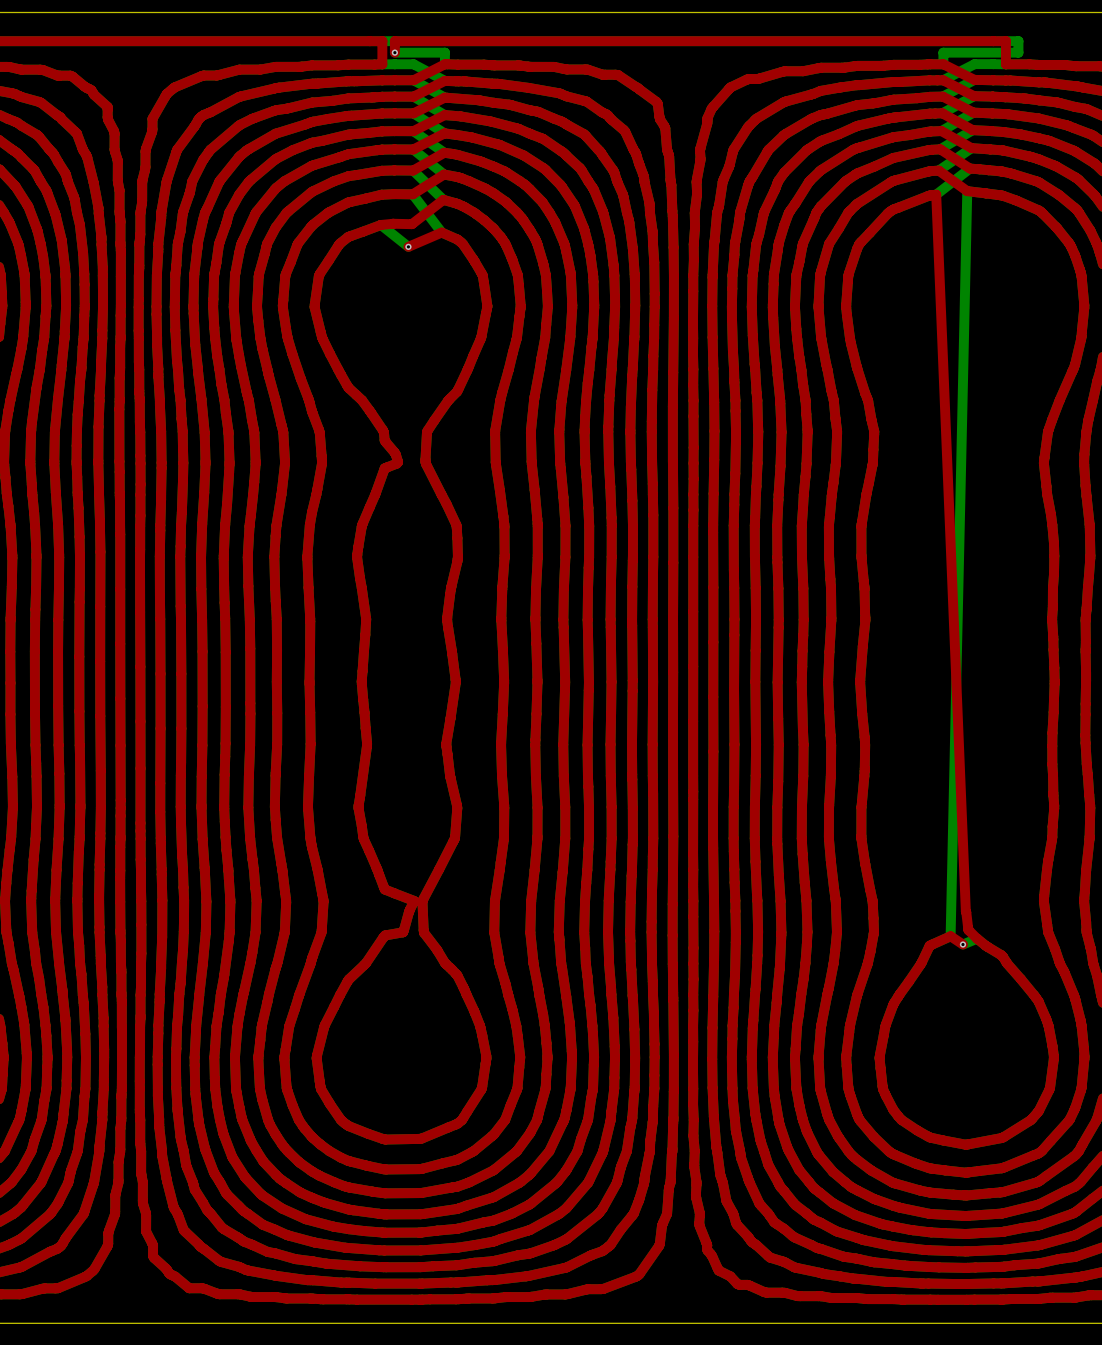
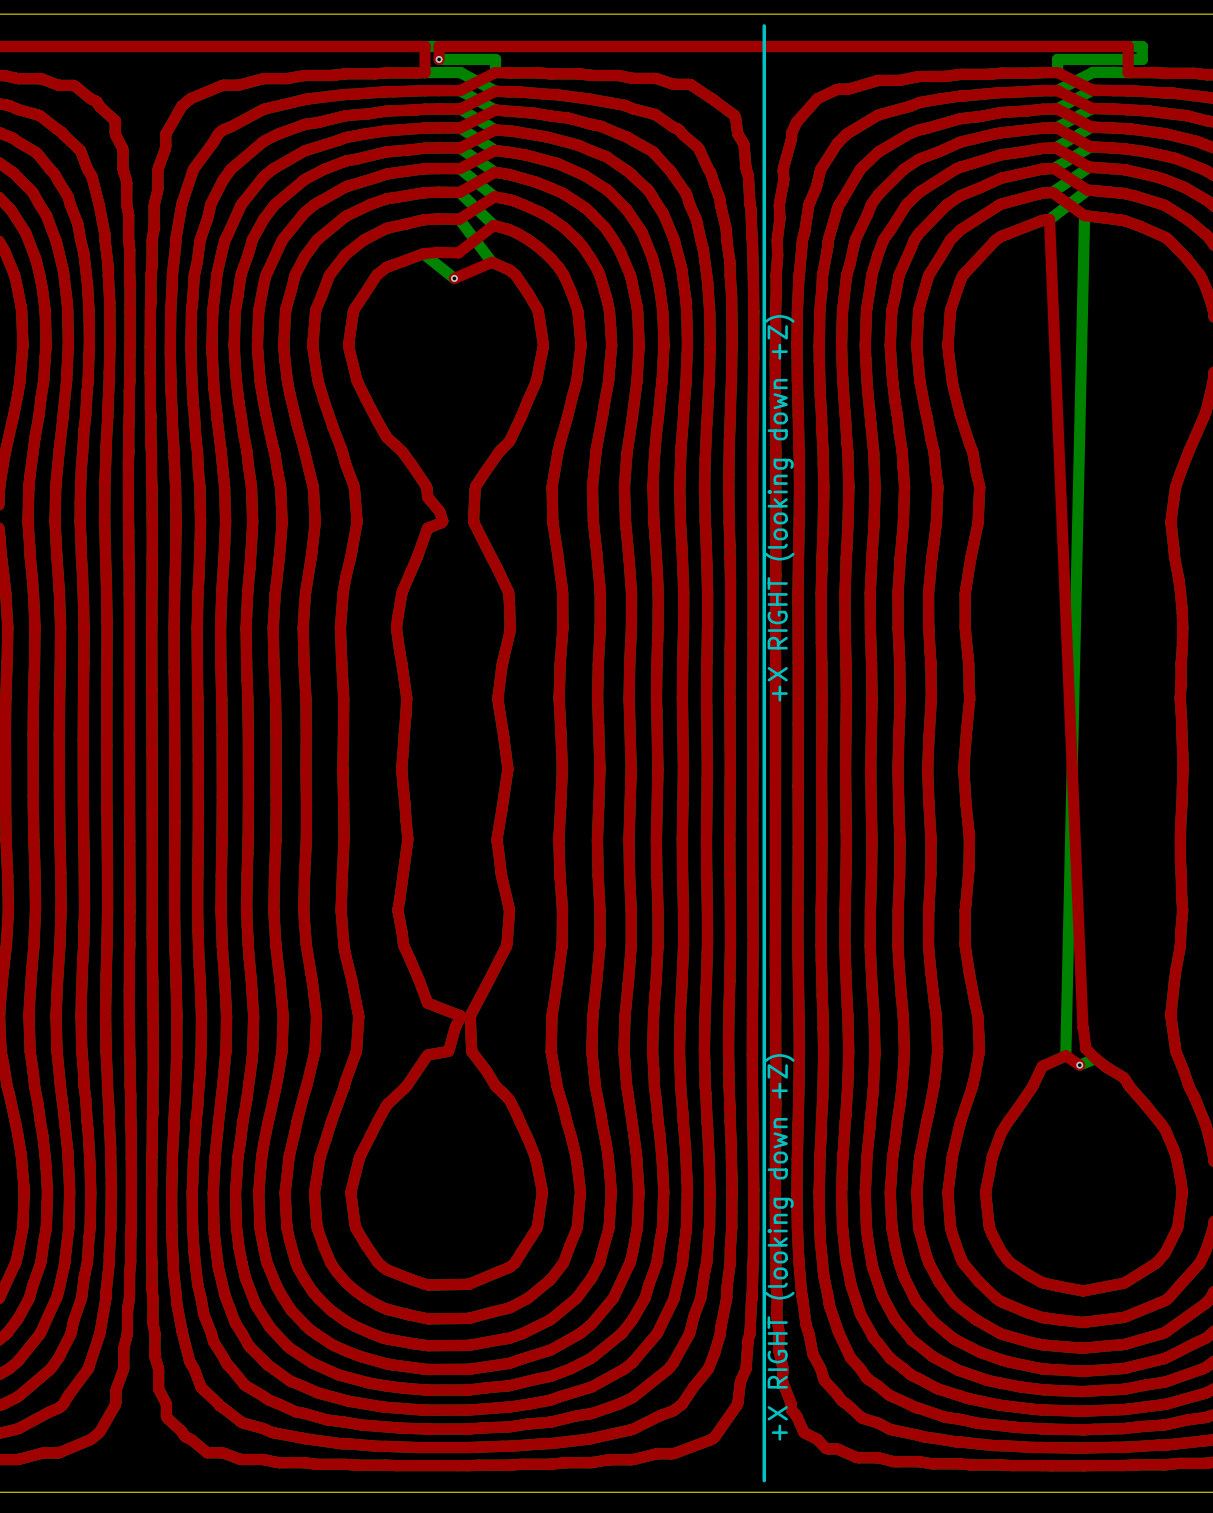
line: none -> (764, 25) (764, 1480)
text: none -> +X RIGHT (looking down +Z) (779, 508)
text: none -> +X RIGHT (looking down +Z) (779, 1247)

